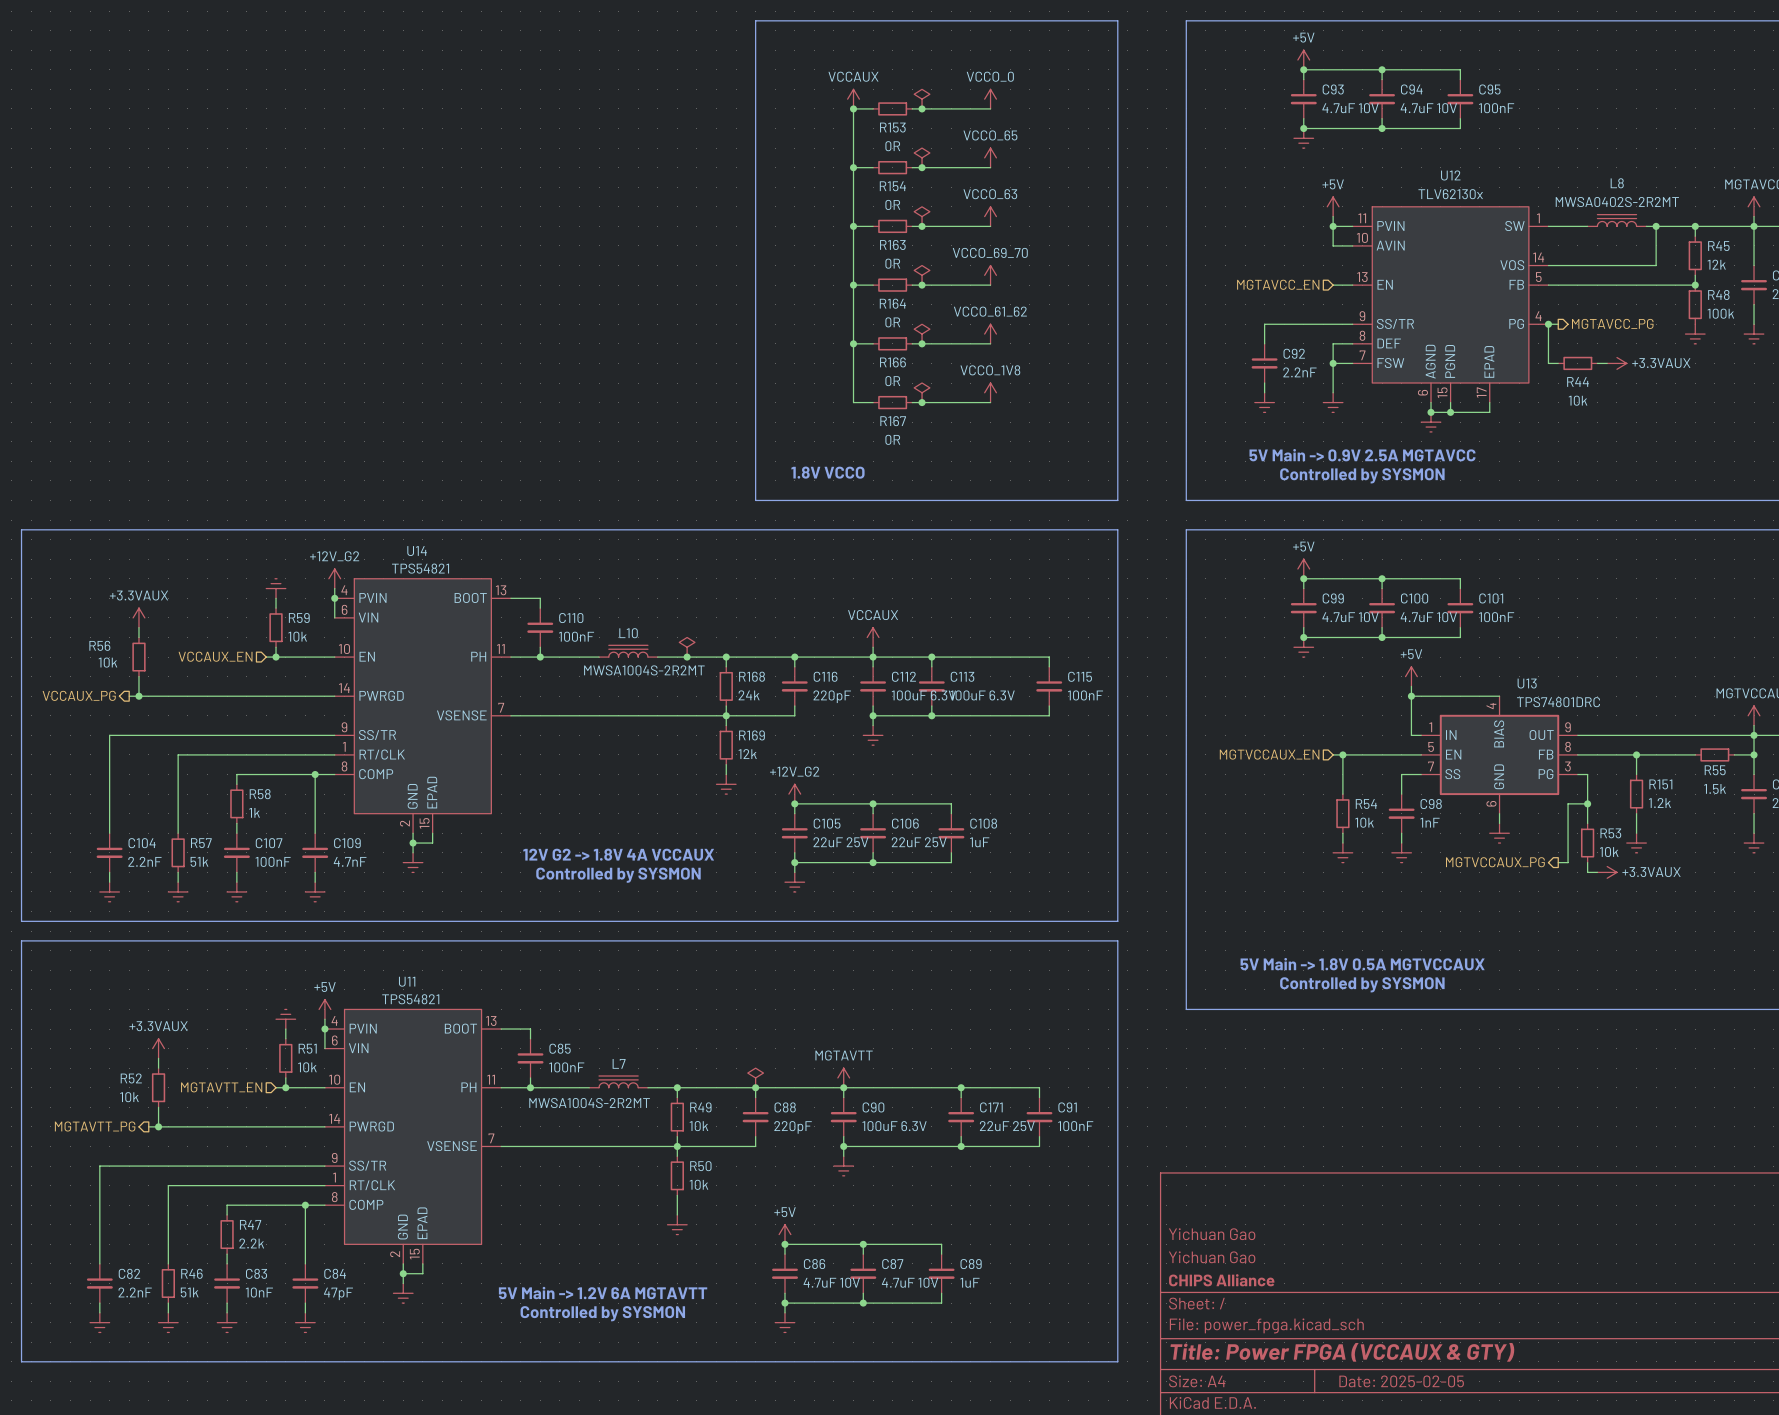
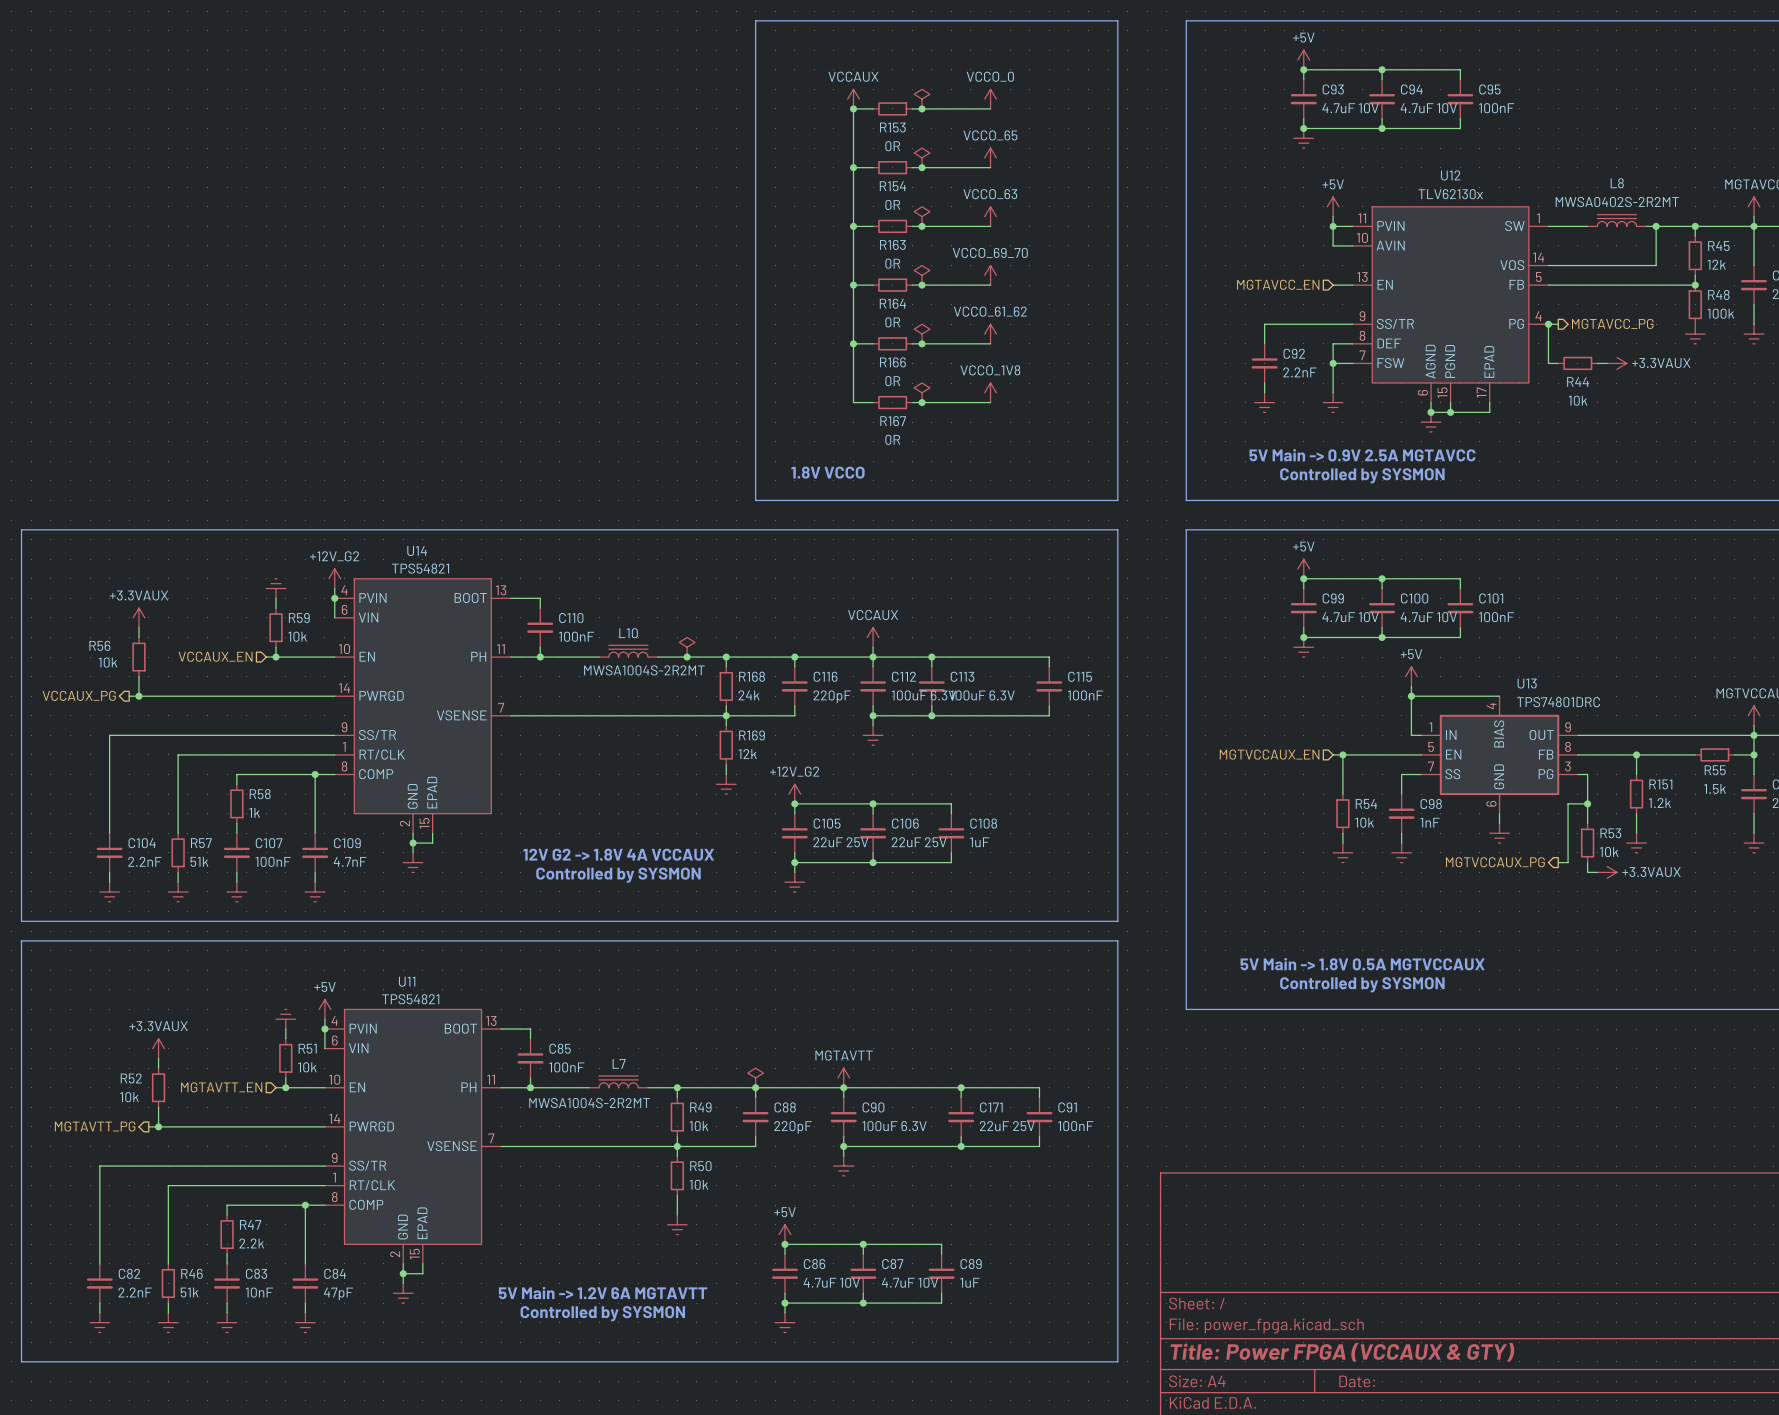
title block: Yichuan Gao (1212, 1234) -> none
title block: Yichuan Gao (1212, 1257) -> none
title block: CHIPS Alliance (1221, 1280) -> none
title block: Date: 2025-02-05 (1401, 1381) -> Date: (1357, 1381)

